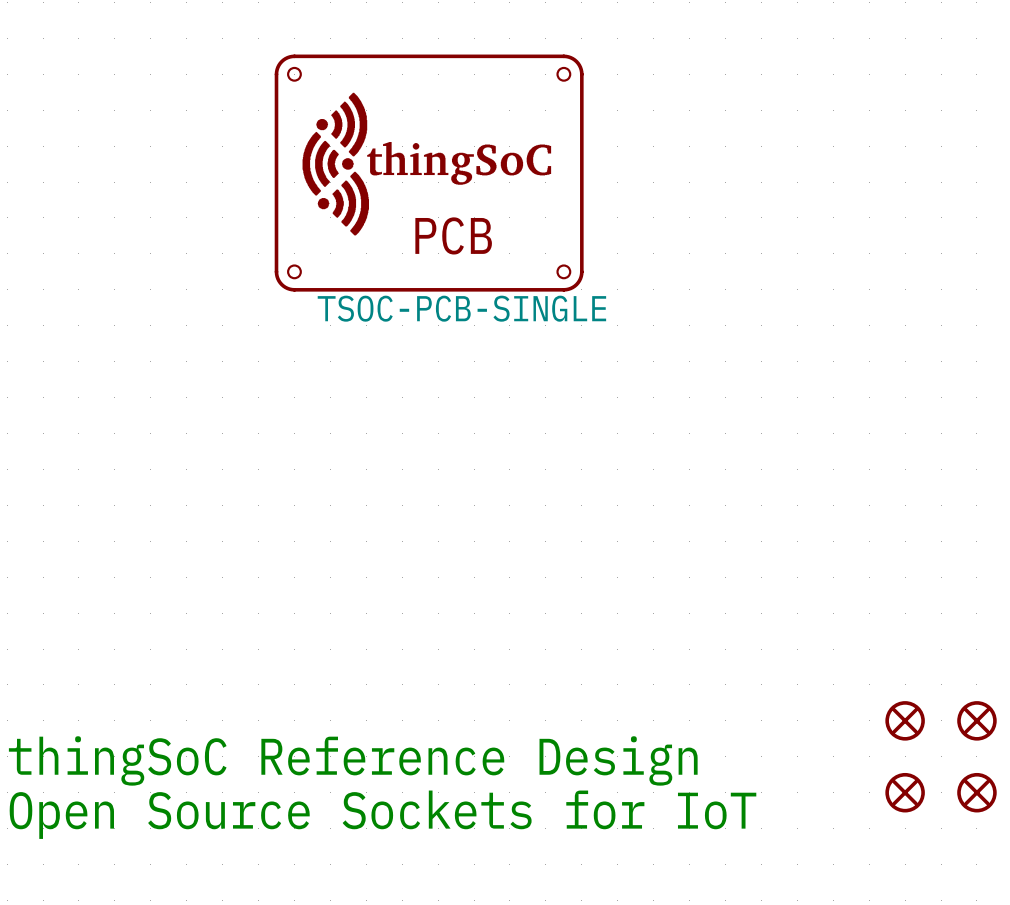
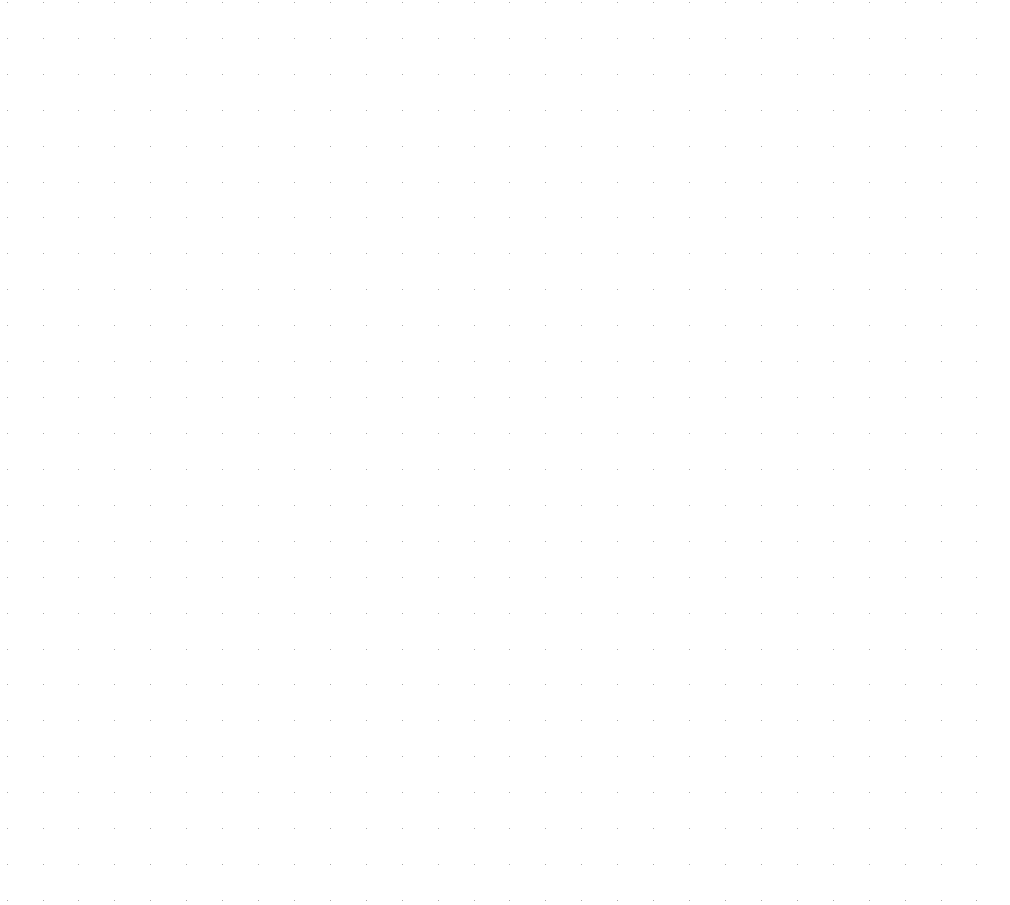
part: TSOC-PCB-SINGLE (429, 173) -> none
part: (905, 720) -> none
part: (976, 720) -> none
text: thingSoC Reference Design (353, 760) -> none
part: (905, 792) -> none
part: (976, 792) -> none
text: Open Source Sockets for IoT (382, 814) -> none

